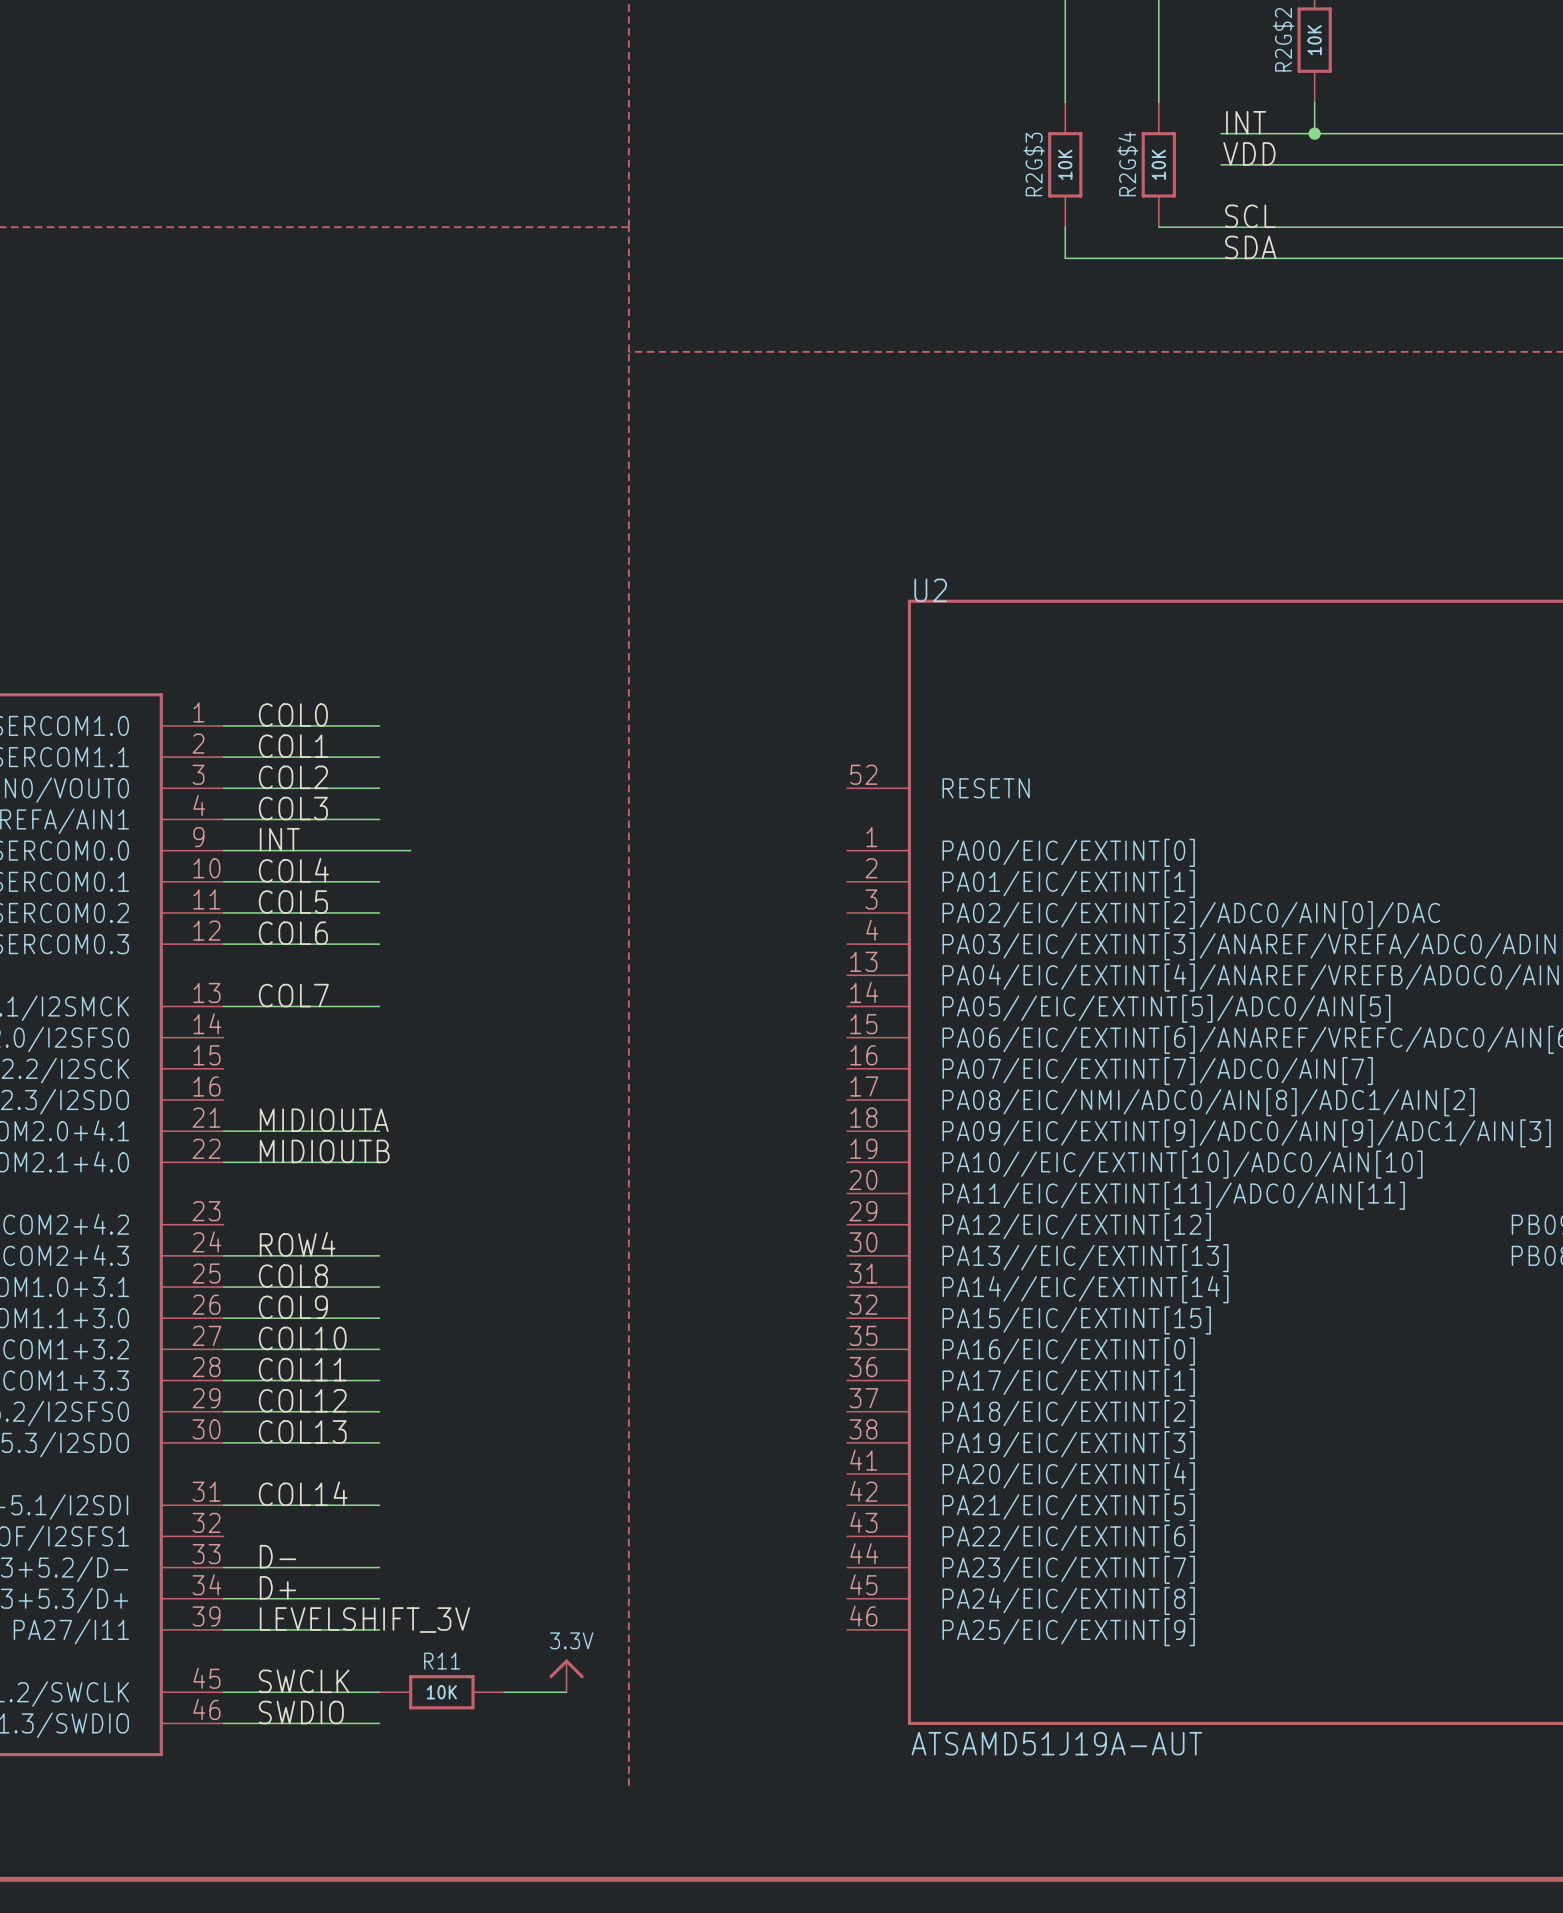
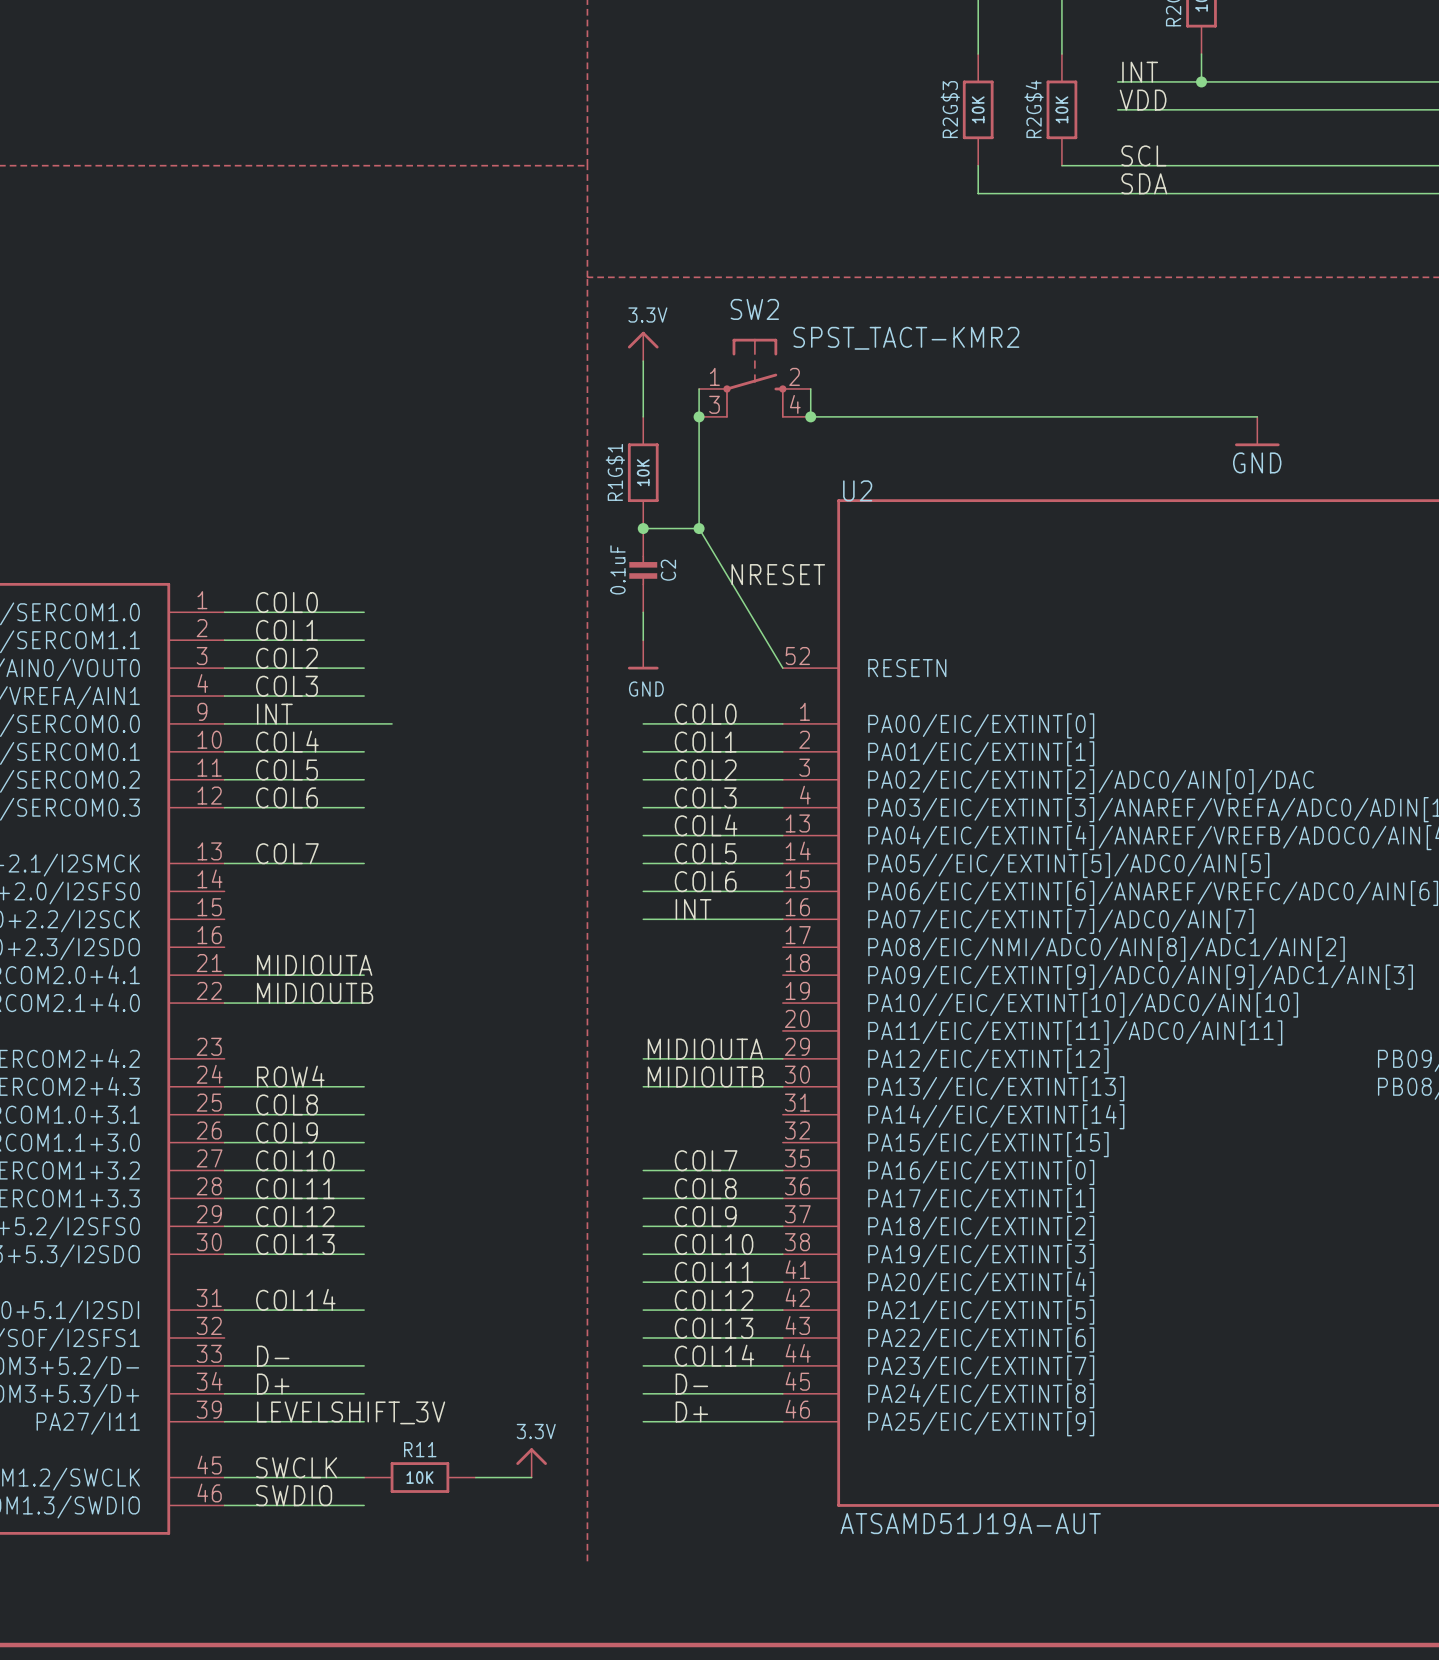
power symbol: none -> 3.3V (643, 346)
wire: none -> (643, 361) (643, 416)
SW2: none -> SPST_TACT-KMR2 (754, 378)
wire: none -> (699, 388) (699, 528)
wire: none -> (810, 388) (810, 416) (1257, 416)
junction: none -> (699, 416)
junction: none -> (810, 416)
power symbol: none -> GND (1257, 431)
R1G$1: none -> 10K (643, 472)
wire: none -> (643, 528) (699, 528)
junction: none -> (643, 528)
wire: none -> (699, 528) (782, 668)
junction: none -> (699, 528)
C2: none -> 0.1uF (643, 570)
label: none -> NRESET (778, 574)
wire: none -> (643, 612) (643, 640)
power symbol: none -> GND (643, 654)
label: none -> COL0 (705, 714)
wire: none -> (643, 723) (782, 723)
label: none -> COL1 (705, 742)
wire: none -> (643, 751) (782, 751)
label: none -> COL2 (705, 769)
wire: none -> (643, 779) (782, 779)
label: none -> COL3 (705, 797)
wire: none -> (643, 807) (782, 807)
label: none -> COL4 (706, 825)
wire: none -> (643, 835) (782, 835)
label: none -> COL5 (705, 853)
wire: none -> (643, 863) (782, 863)
label: none -> COL6 (705, 881)
wire: none -> (643, 891) (782, 891)
label: none -> INT (693, 909)
wire: none -> (643, 919) (782, 919)
label: none -> MIDIOUTA (705, 1049)
wire: none -> (643, 1058) (782, 1058)
label: none -> MIDIOUTB (705, 1077)
wire: none -> (643, 1086) (782, 1086)
label: none -> COL7 (706, 1160)
wire: none -> (643, 1170) (782, 1170)
label: none -> COL8 (705, 1188)
wire: none -> (643, 1198) (782, 1198)
label: none -> COL9 (705, 1216)
wire: none -> (643, 1226) (782, 1226)
label: none -> COL10 (714, 1244)
wire: none -> (643, 1254) (782, 1254)
label: none -> COL11 (714, 1272)
wire: none -> (643, 1282) (782, 1282)
label: none -> COL12 (714, 1300)
wire: none -> (643, 1310) (782, 1310)
label: none -> COL13 (714, 1328)
wire: none -> (643, 1337) (782, 1337)
label: none -> COL14 (714, 1355)
wire: none -> (643, 1365) (782, 1365)
label: none -> D- (691, 1384)
wire: none -> (643, 1393) (782, 1393)
label: none -> D+ (691, 1411)
wire: none -> (643, 1421) (782, 1421)

